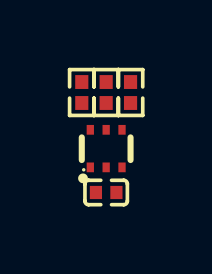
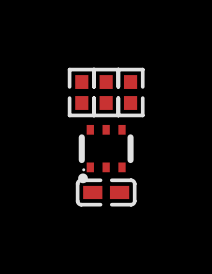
part footprint: [83, 178, 130, 207] -> [75, 178, 137, 207]

